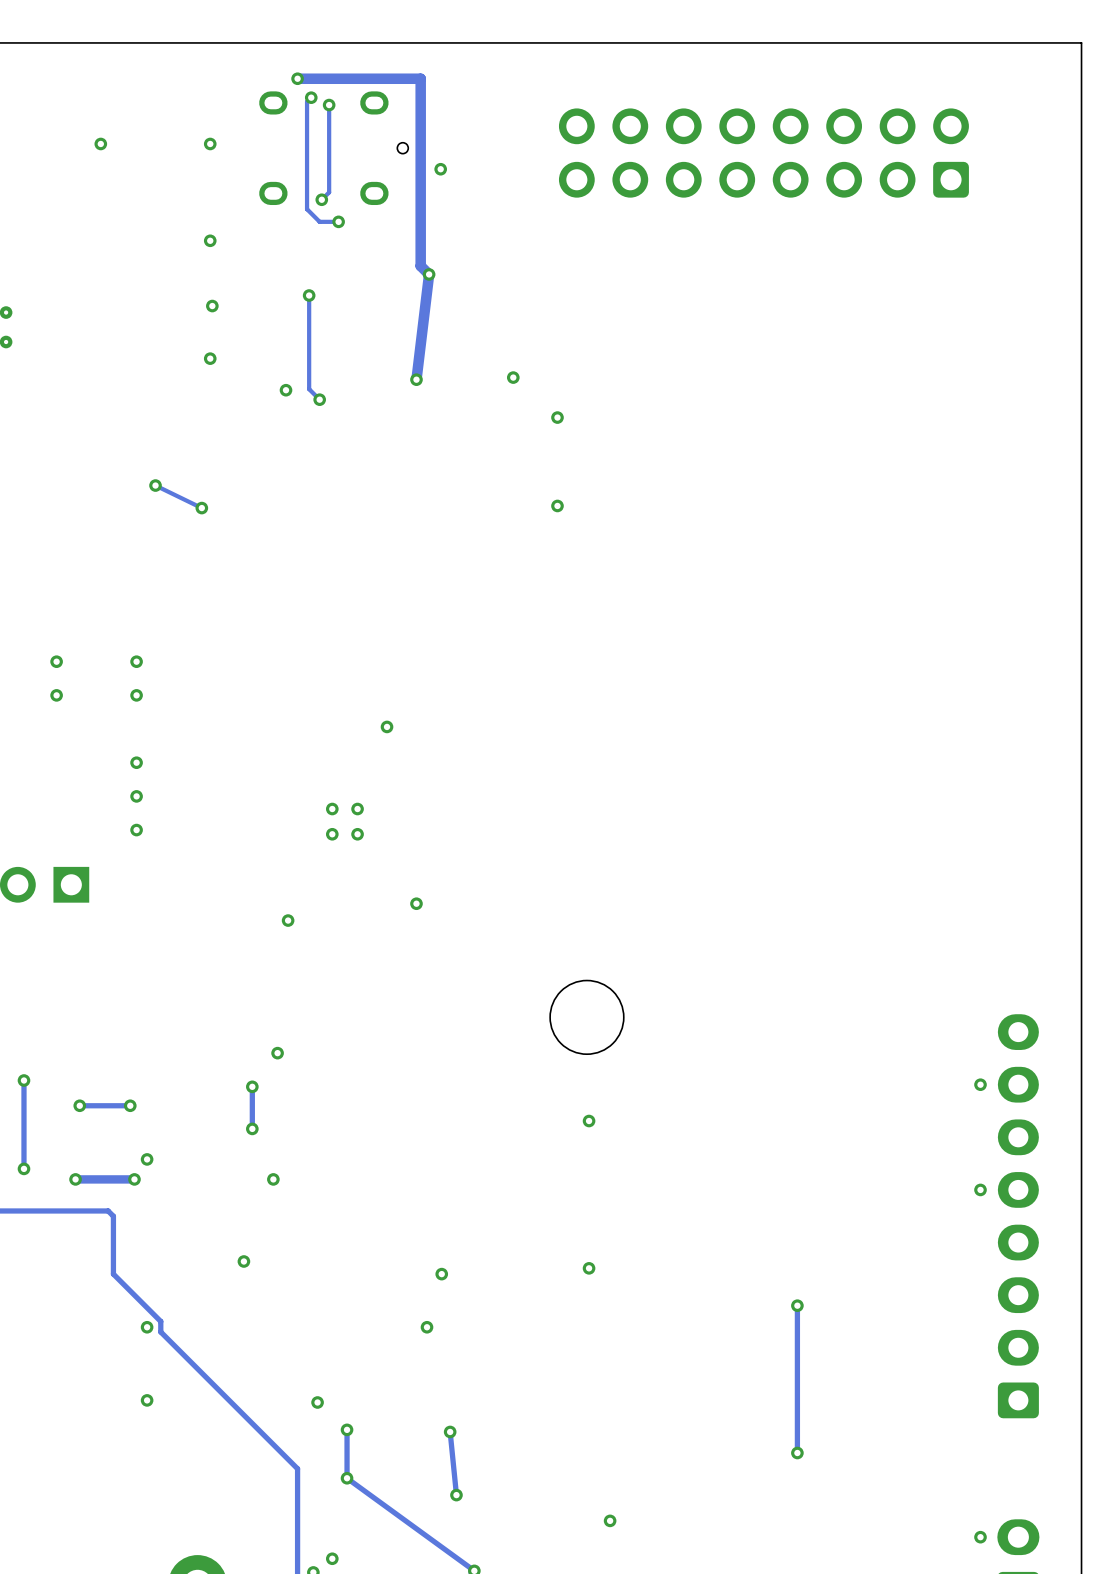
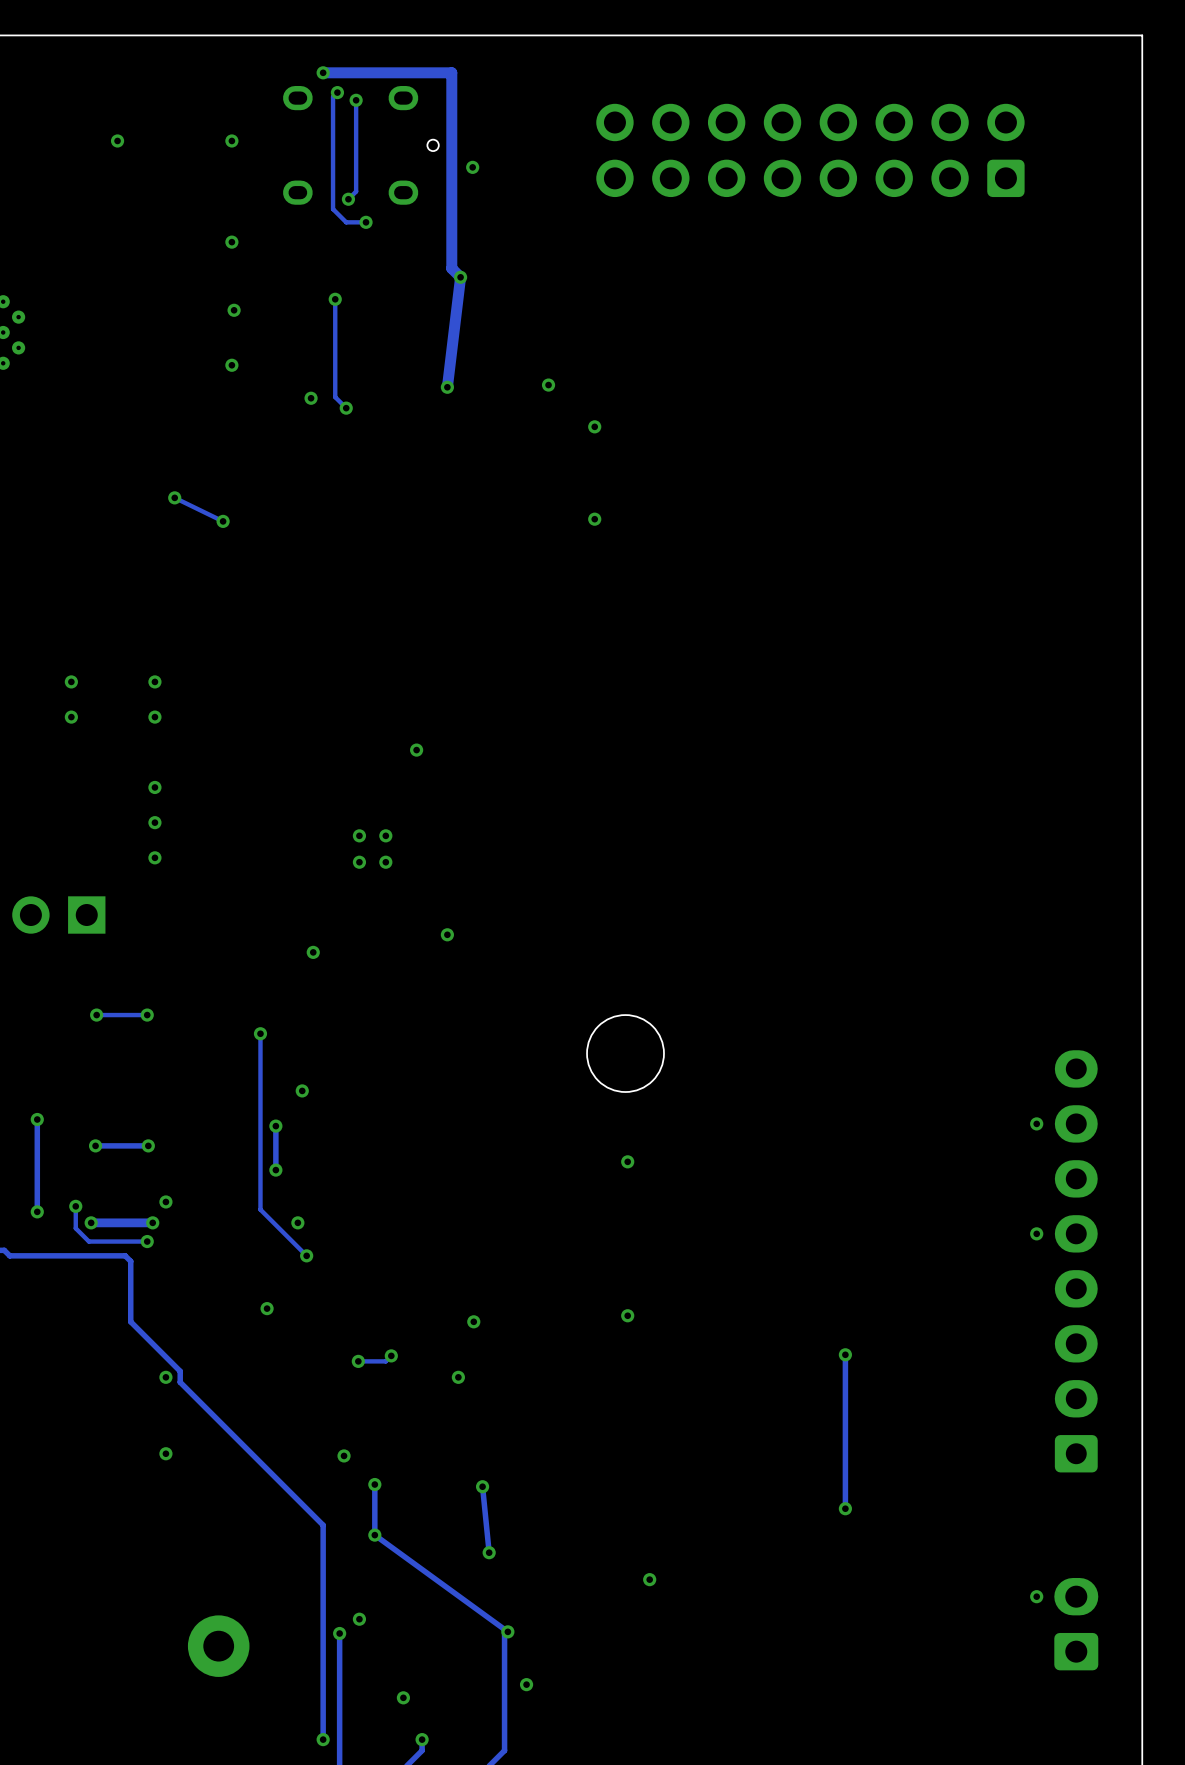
via: none -> (96, 1015)
track: none -> (147, 1015) (96, 1015)
via: none -> (147, 1015)
track: none -> (260, 1033) (260, 1209) (306, 1255)
via: none -> (260, 1033)
track: none -> (75, 1206) (75, 1228) (88, 1241) (147, 1241)
via: none -> (75, 1206)
via: none -> (147, 1241)
via: none -> (306, 1255)
track: none -> (391, 1355) (385, 1361) (358, 1361)
via: none -> (391, 1355)
via: none -> (358, 1361)

